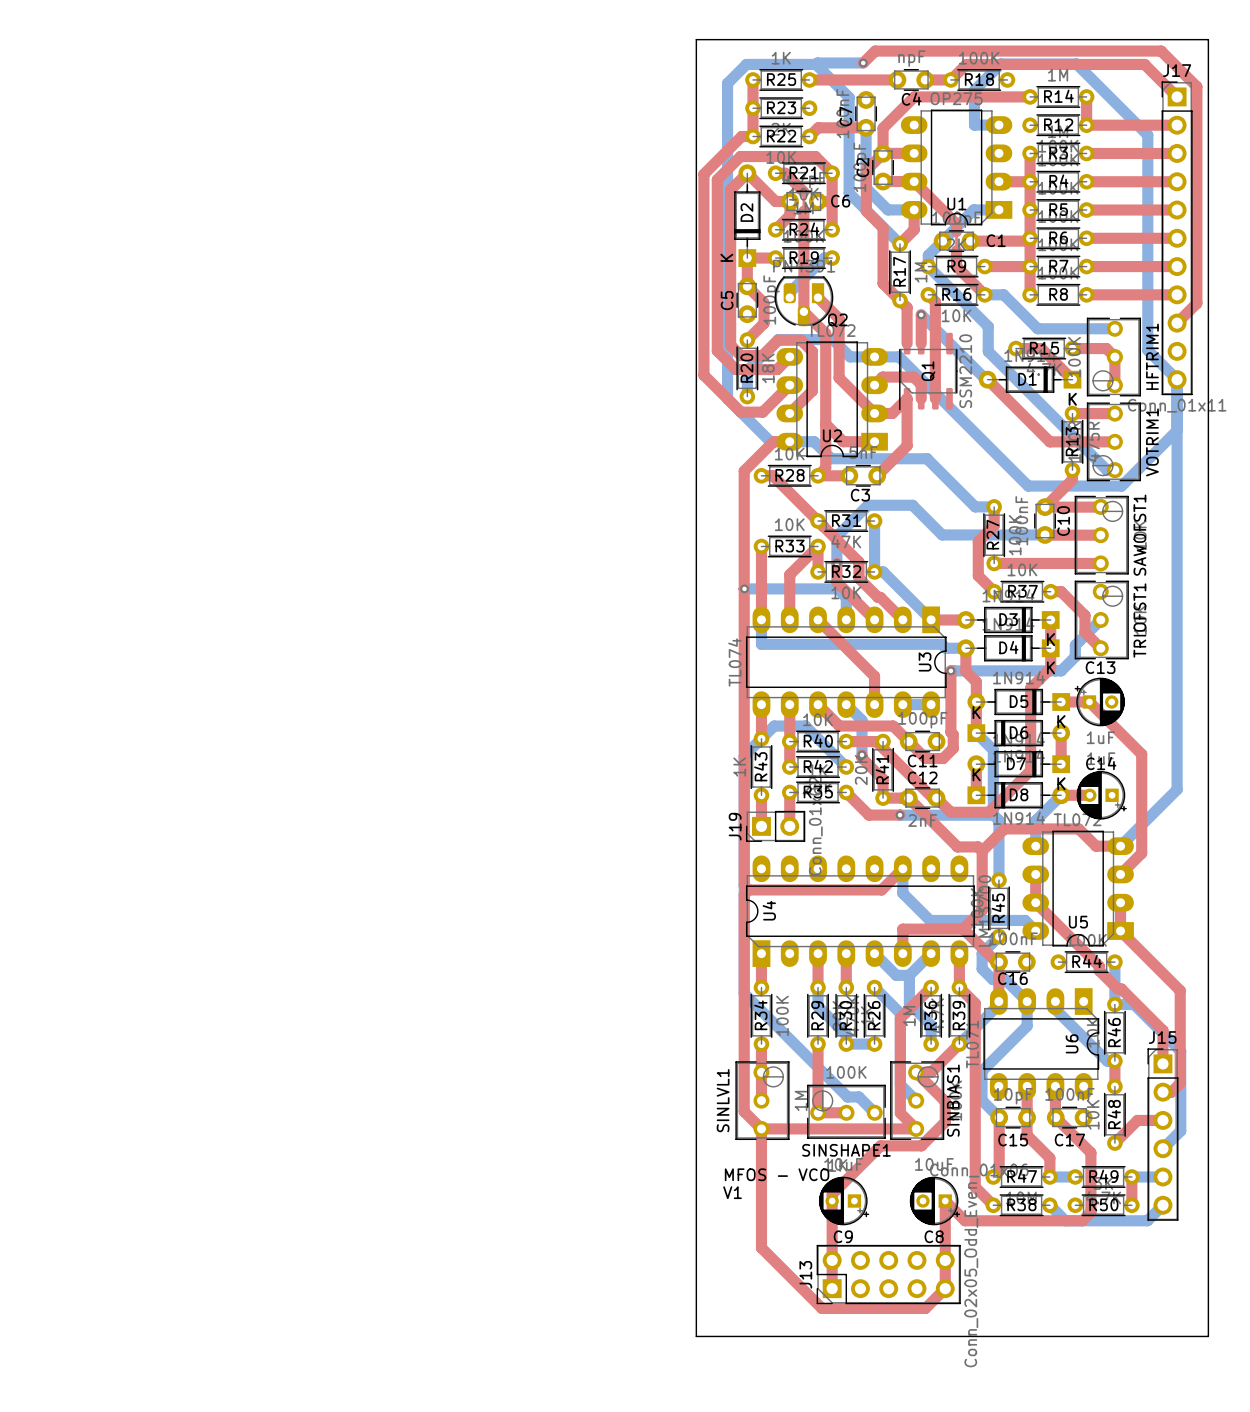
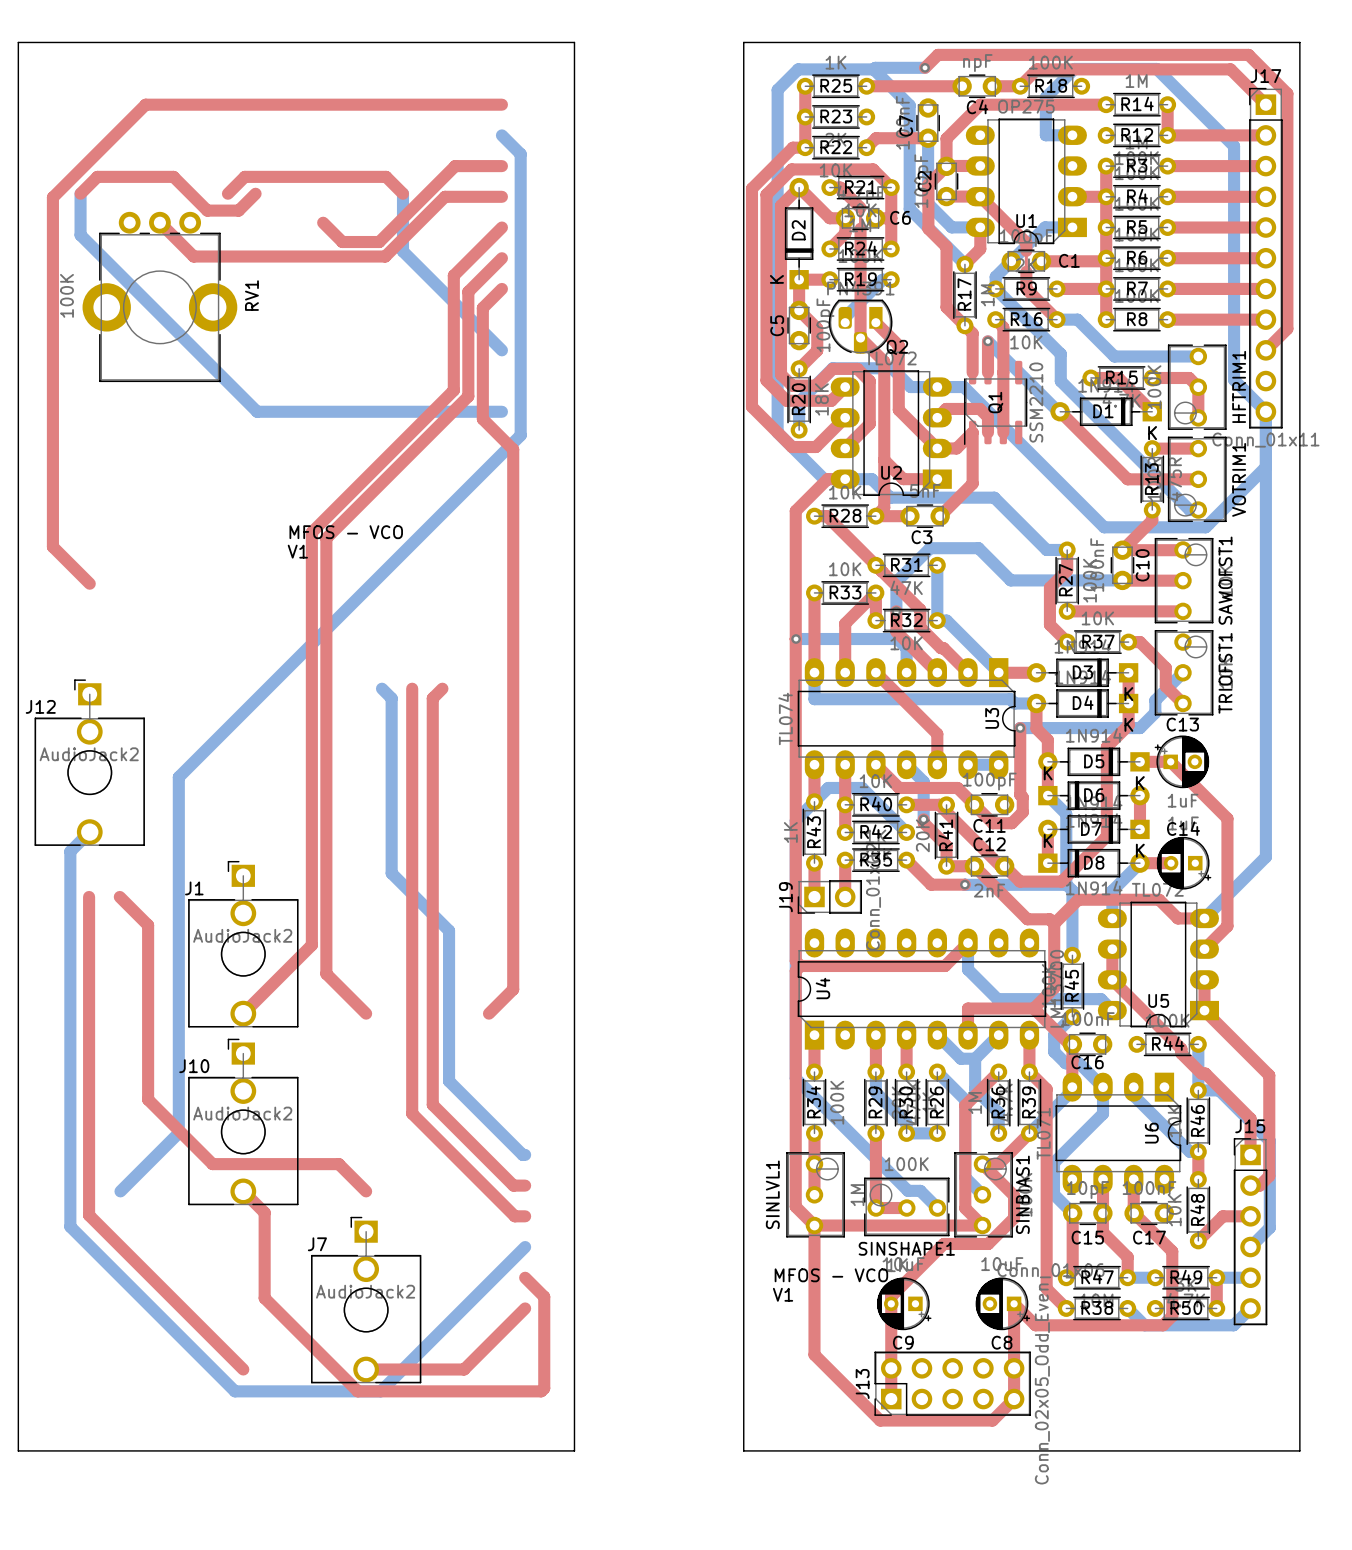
board edge: none -> (18, 42) (574, 42) (574, 1450) (18, 1450) (18, 42)
top track: none -> (501, 104) (145, 104) (52, 197) (52, 546) (89, 583)
bottom track: none -> (501, 135) (520, 154) (520, 435) (178, 777) (178, 1133) (120, 1191)
top track: none -> (501, 166) (455, 166) (379, 242) (342, 242) (323, 222)
top track: none -> (80, 193) (97, 176) (173, 176) (207, 210) (238, 210) (255, 193)
bottom track: none -> (80, 193) (80, 235) (257, 411) (501, 411)
top track: none -> (227, 193) (244, 176) (386, 176) (402, 193)
bottom track: none -> (402, 193) (402, 251) (501, 350)
top track: none -> (501, 196) (445, 196) (385, 256) (193, 256) (159, 222)
top track: none -> (501, 227) (453, 275) (453, 390) (311, 532) (311, 945) (243, 1013)
top track: none -> (501, 258) (468, 291) (468, 396) (326, 538) (326, 973) (366, 1013)
top track: none -> (501, 288) (482, 308) (482, 419) (513, 449) (513, 989) (488, 1013)
RV1: none -> 100K (159, 296)
text: none -> MFOS - VCO (346, 532)
text: none -> V1 (297, 551)
bottom track: none -> (381, 688) (391, 698) (391, 873) (449, 930) (449, 1081) (522, 1154) (525, 1154)
top track: none -> (412, 688) (412, 1113) (514, 1216) (525, 1216)
top track: none -> (442, 688) (432, 698) (432, 1104) (513, 1185) (525, 1185)
J12: none -> AudioJack2 (89, 762)
bottom track: none -> (89, 832) (70, 851) (70, 1226) (234, 1391) (380, 1391) (525, 1247)
top track: none -> (89, 896) (89, 1215) (243, 1369)
top track: none -> (119, 896) (148, 925) (148, 1099) (212, 1164) (338, 1164) (366, 1191)
J1: none -> AudioJack2 (243, 944)
J10: none -> AudioJack2 (243, 1121)
top track: none -> (243, 1191) (264, 1212) (264, 1298) (357, 1391) (541, 1391) (544, 1388) (544, 1296) (525, 1277)
J7: none -> AudioJack2 (366, 1300)
top track: none -> (525, 1308) (464, 1369) (366, 1369)

